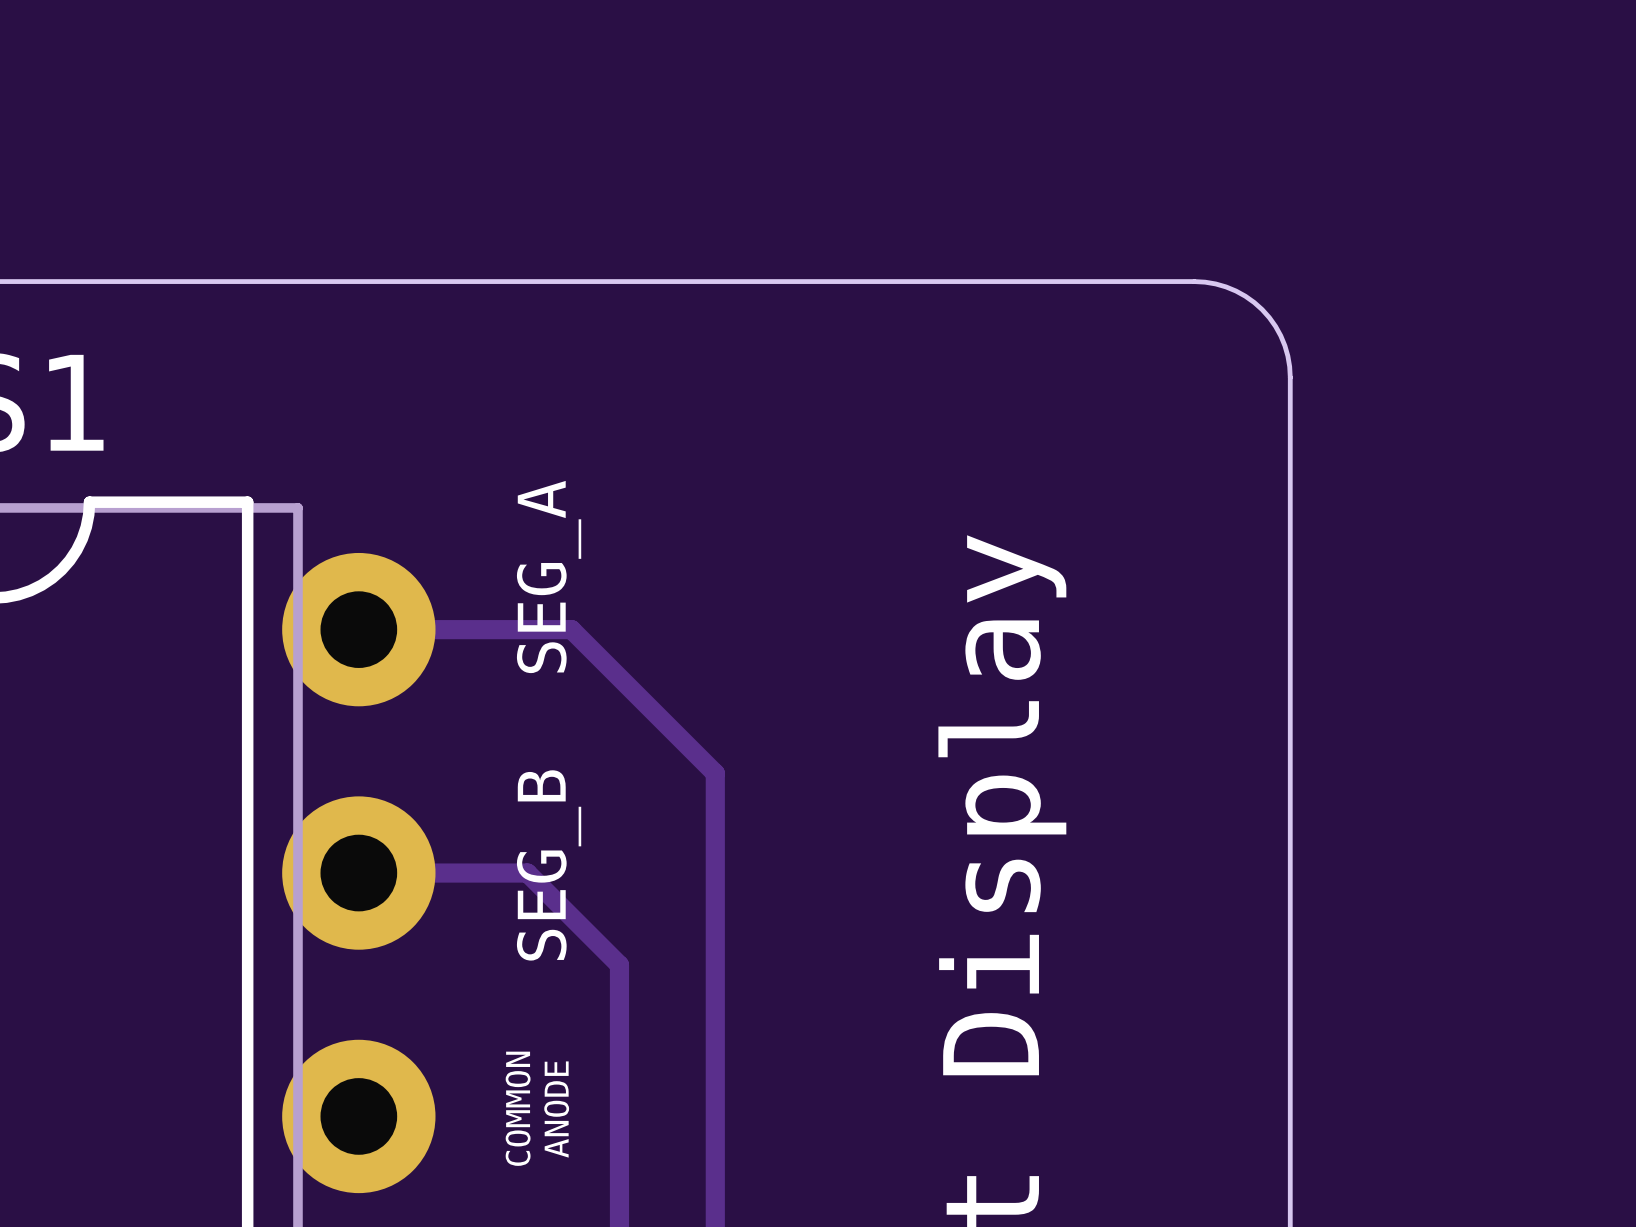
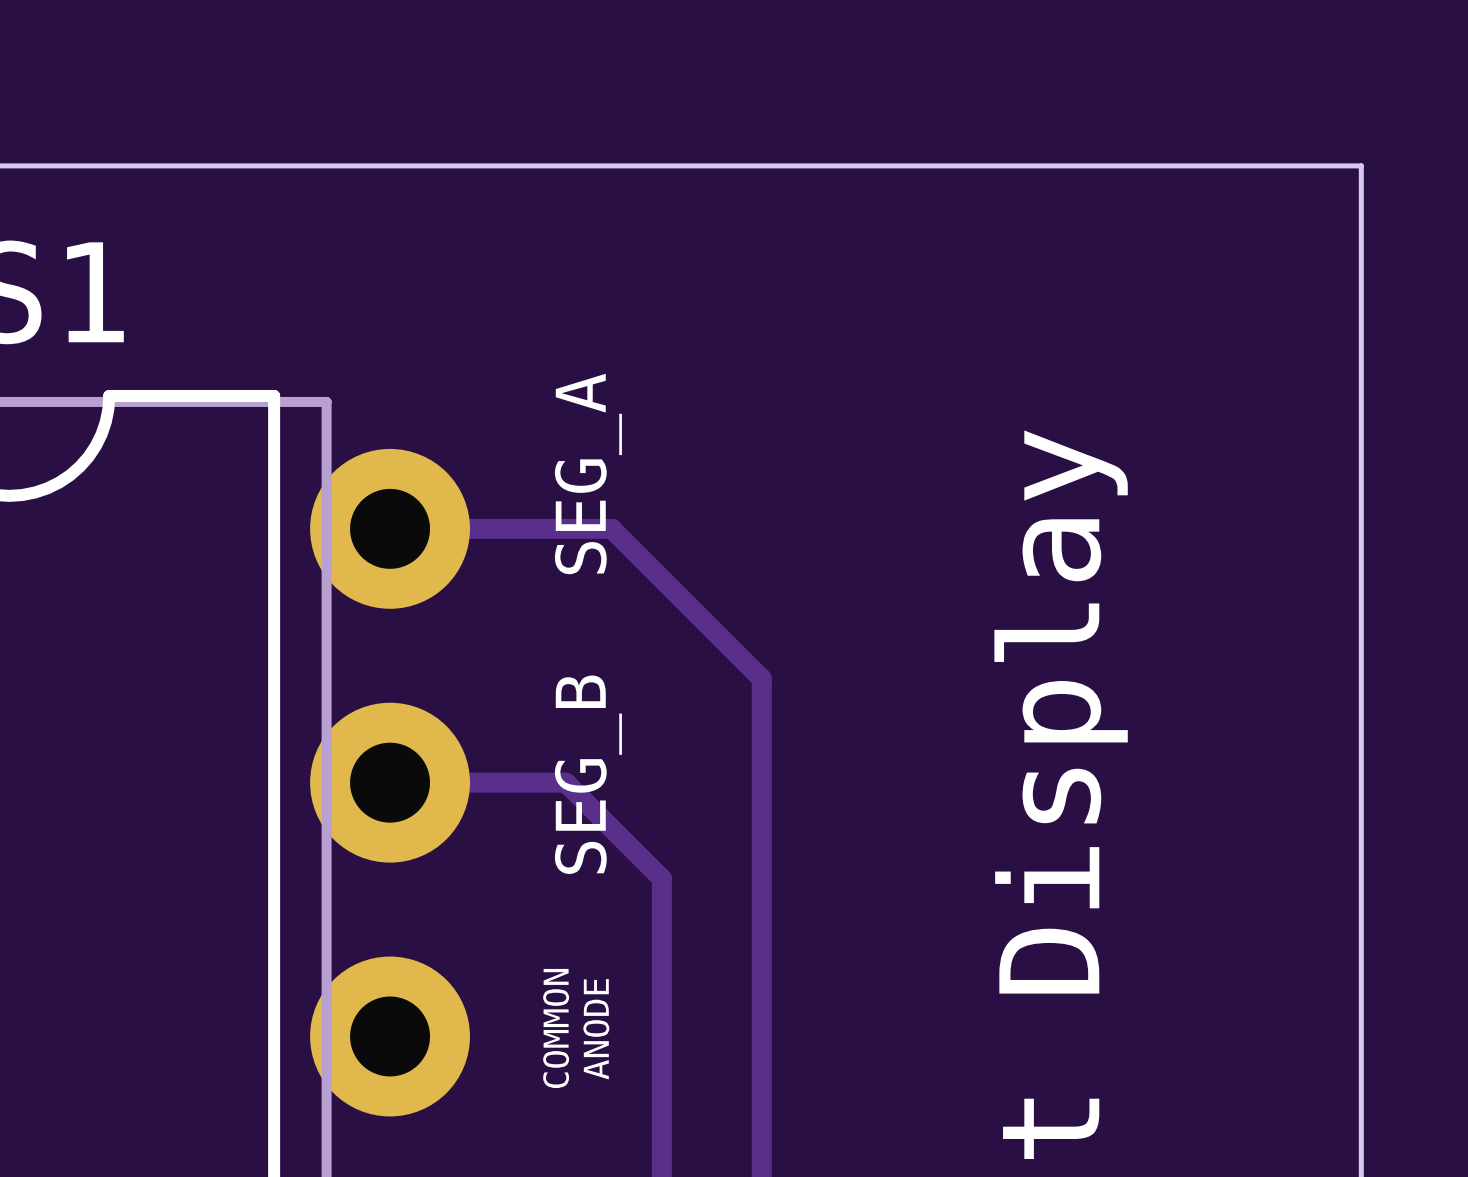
board edge: (1194, 281) (1215, 283) (1236, 291) (1262, 309) (1275, 326) (1284, 345) (1290, 377) -> (1261, 165) (1361, 165) (1361, 265)

